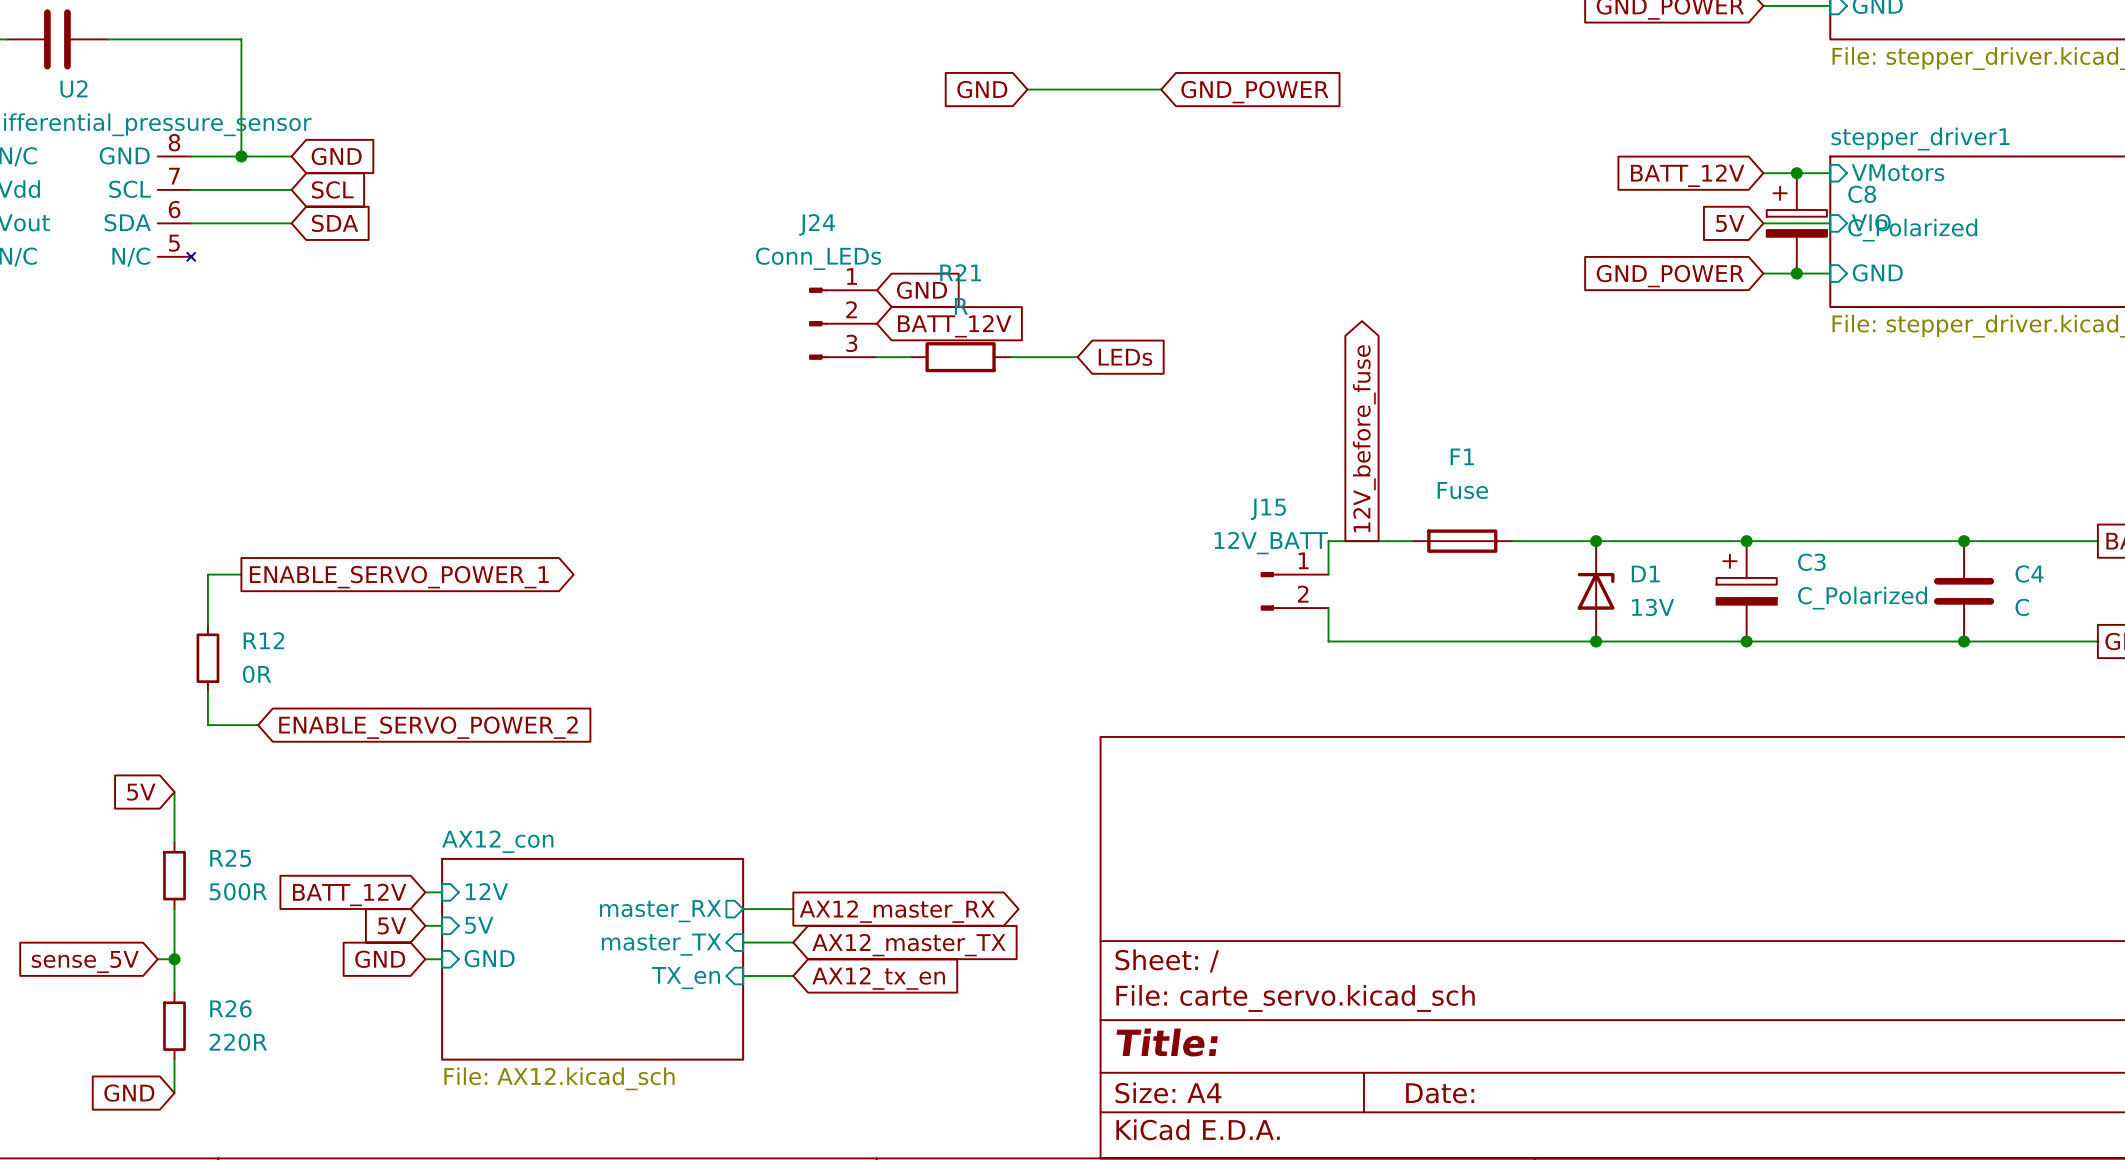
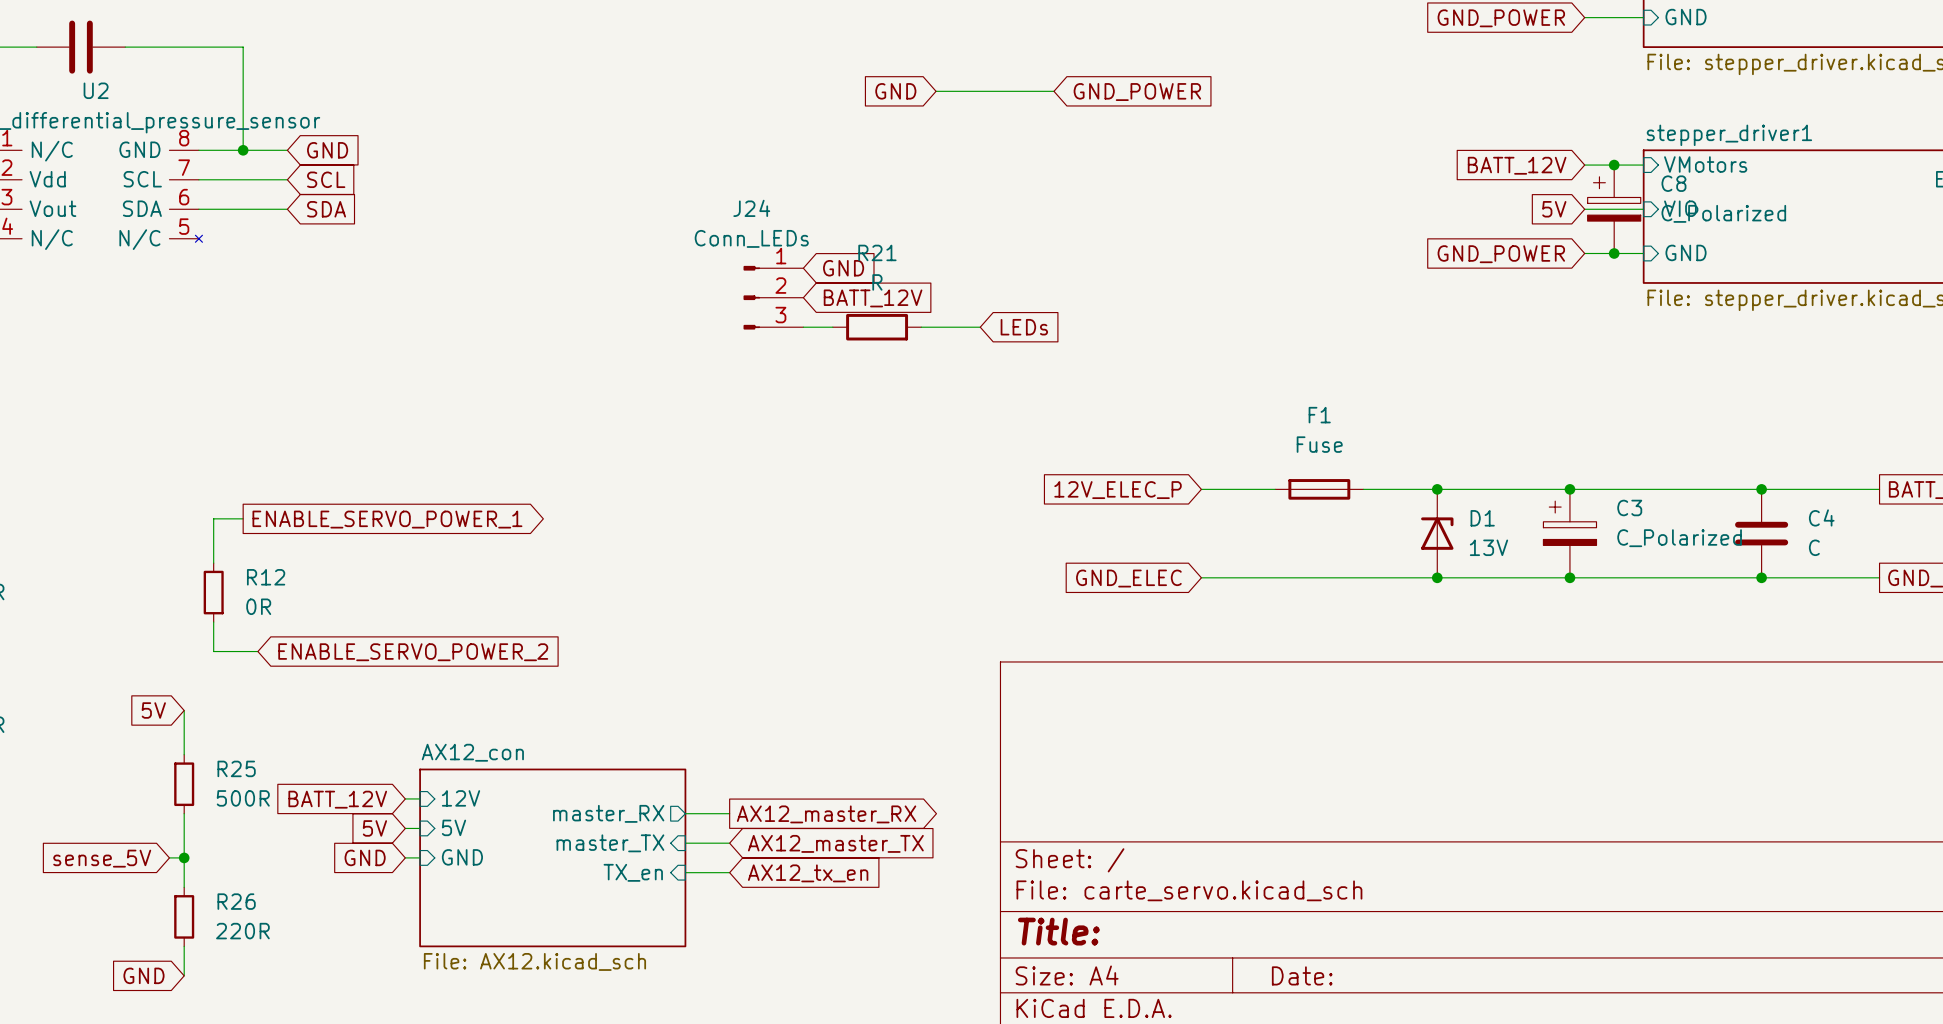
global label: 12V_before_fuse (1364, 438) -> none
wire: (1328, 541) (1328, 574) -> none
global label: none -> 12V_ELEC_P (1118, 490)
J15: 12V_BATT (1294, 591) -> none
wire: (1328, 608) (1328, 641) -> none
global label: none -> GND_ELEC (1128, 578)

